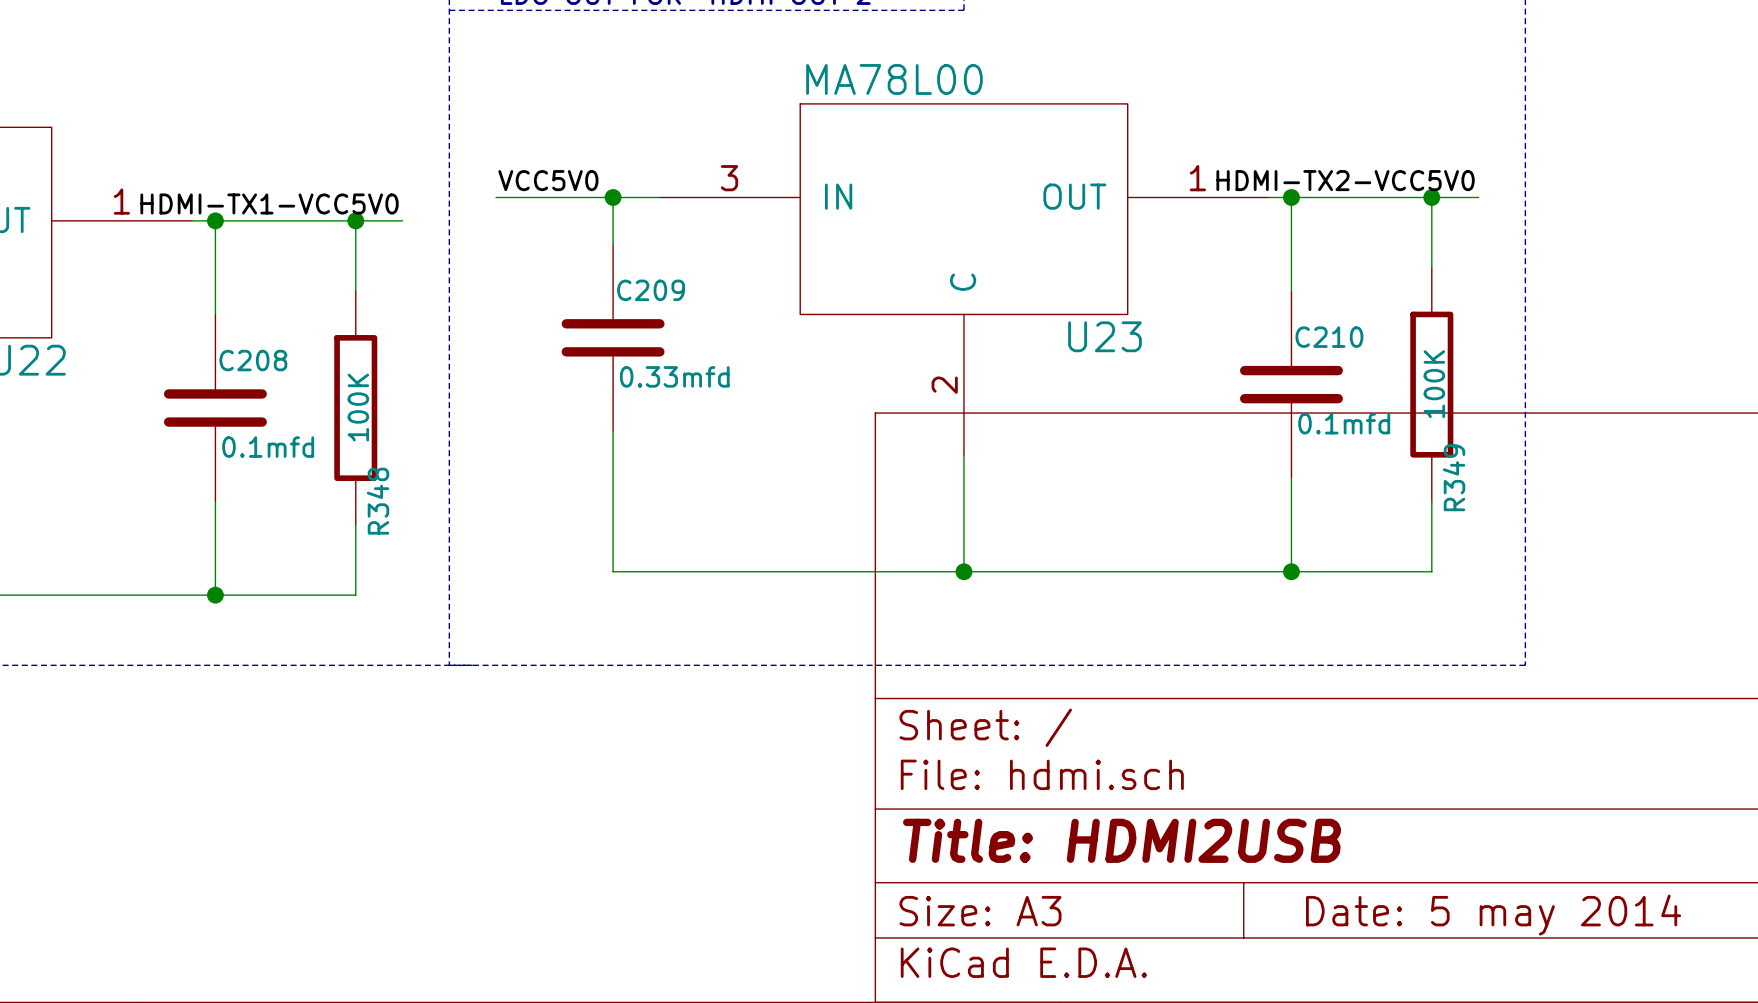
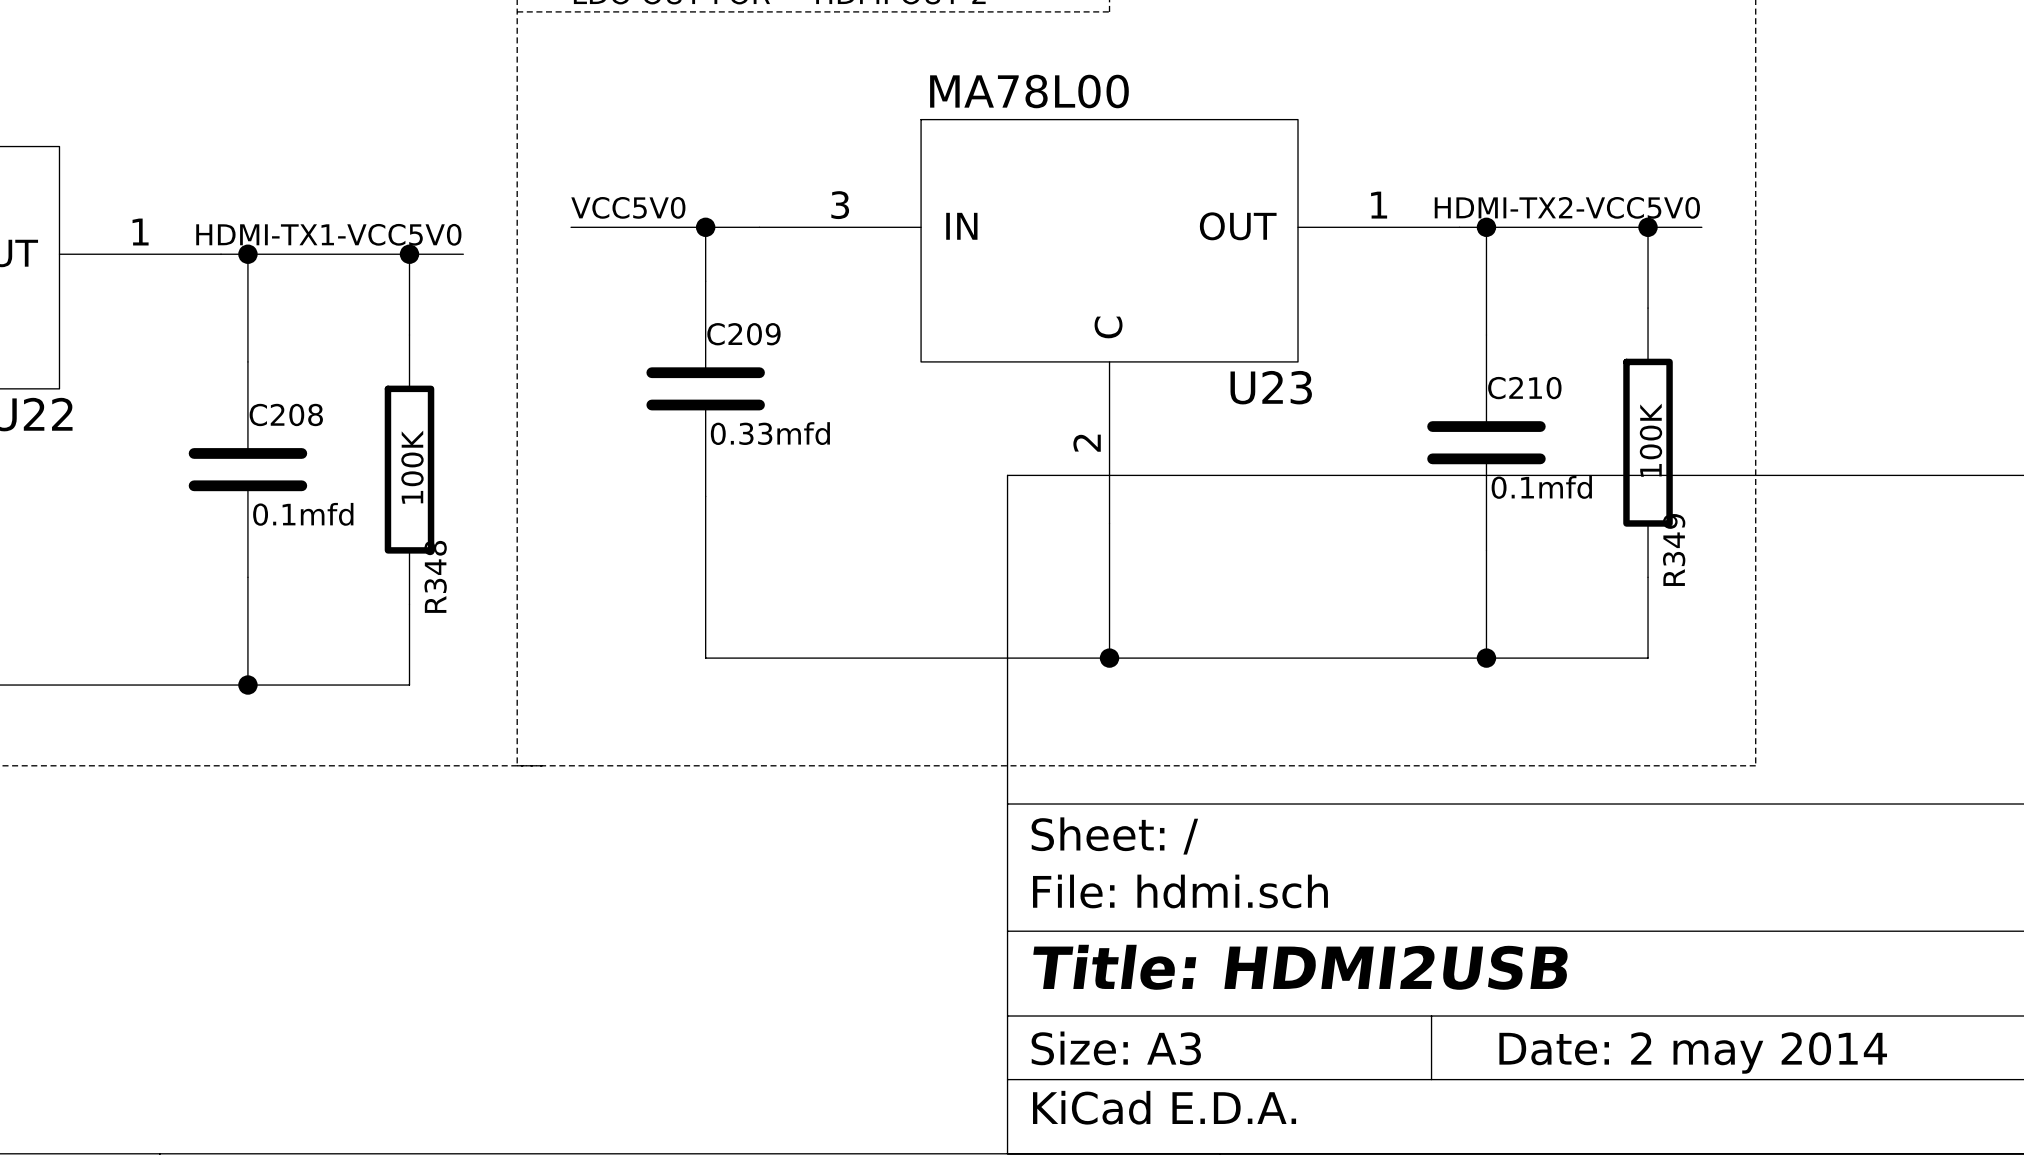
title block: Date: 5 may 2014 (1493, 915) -> Date: 2 may 2014 (1693, 1052)

